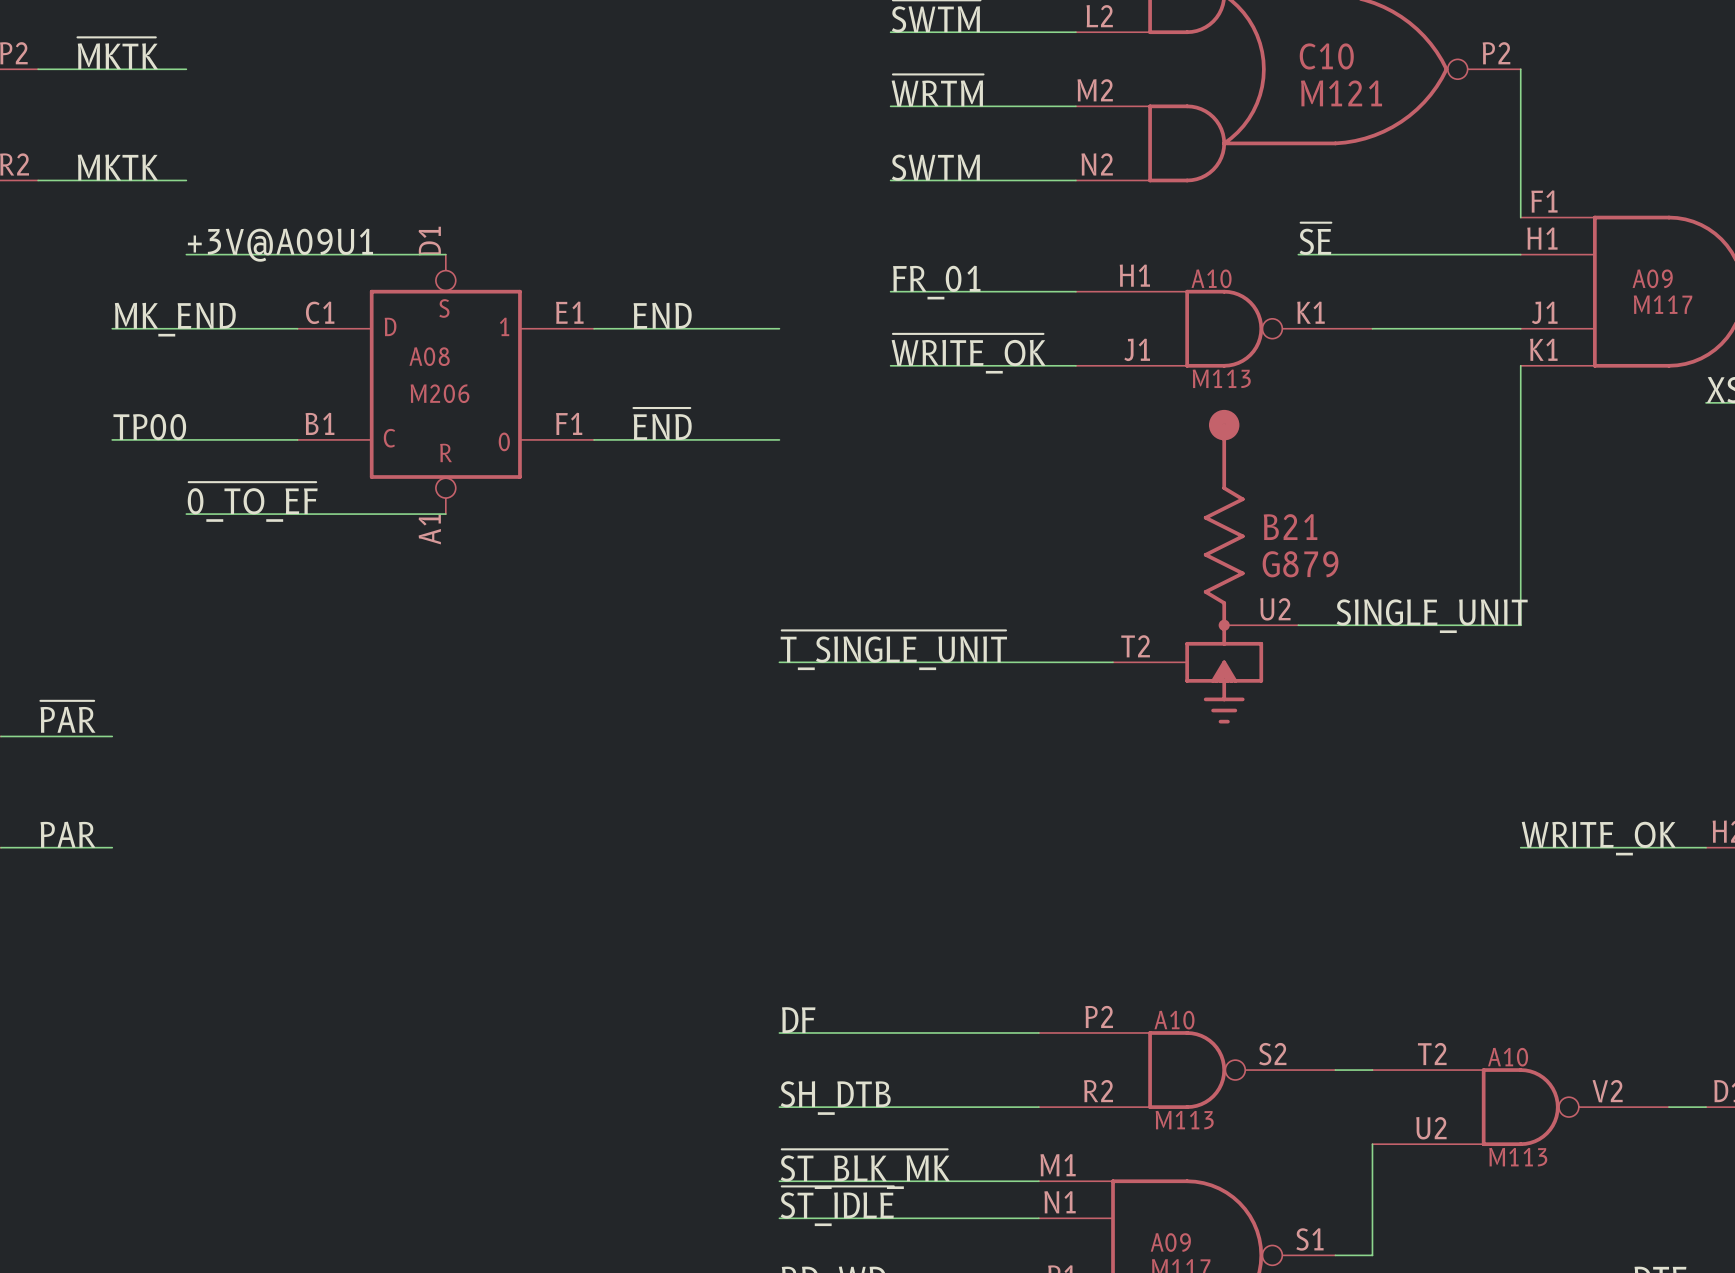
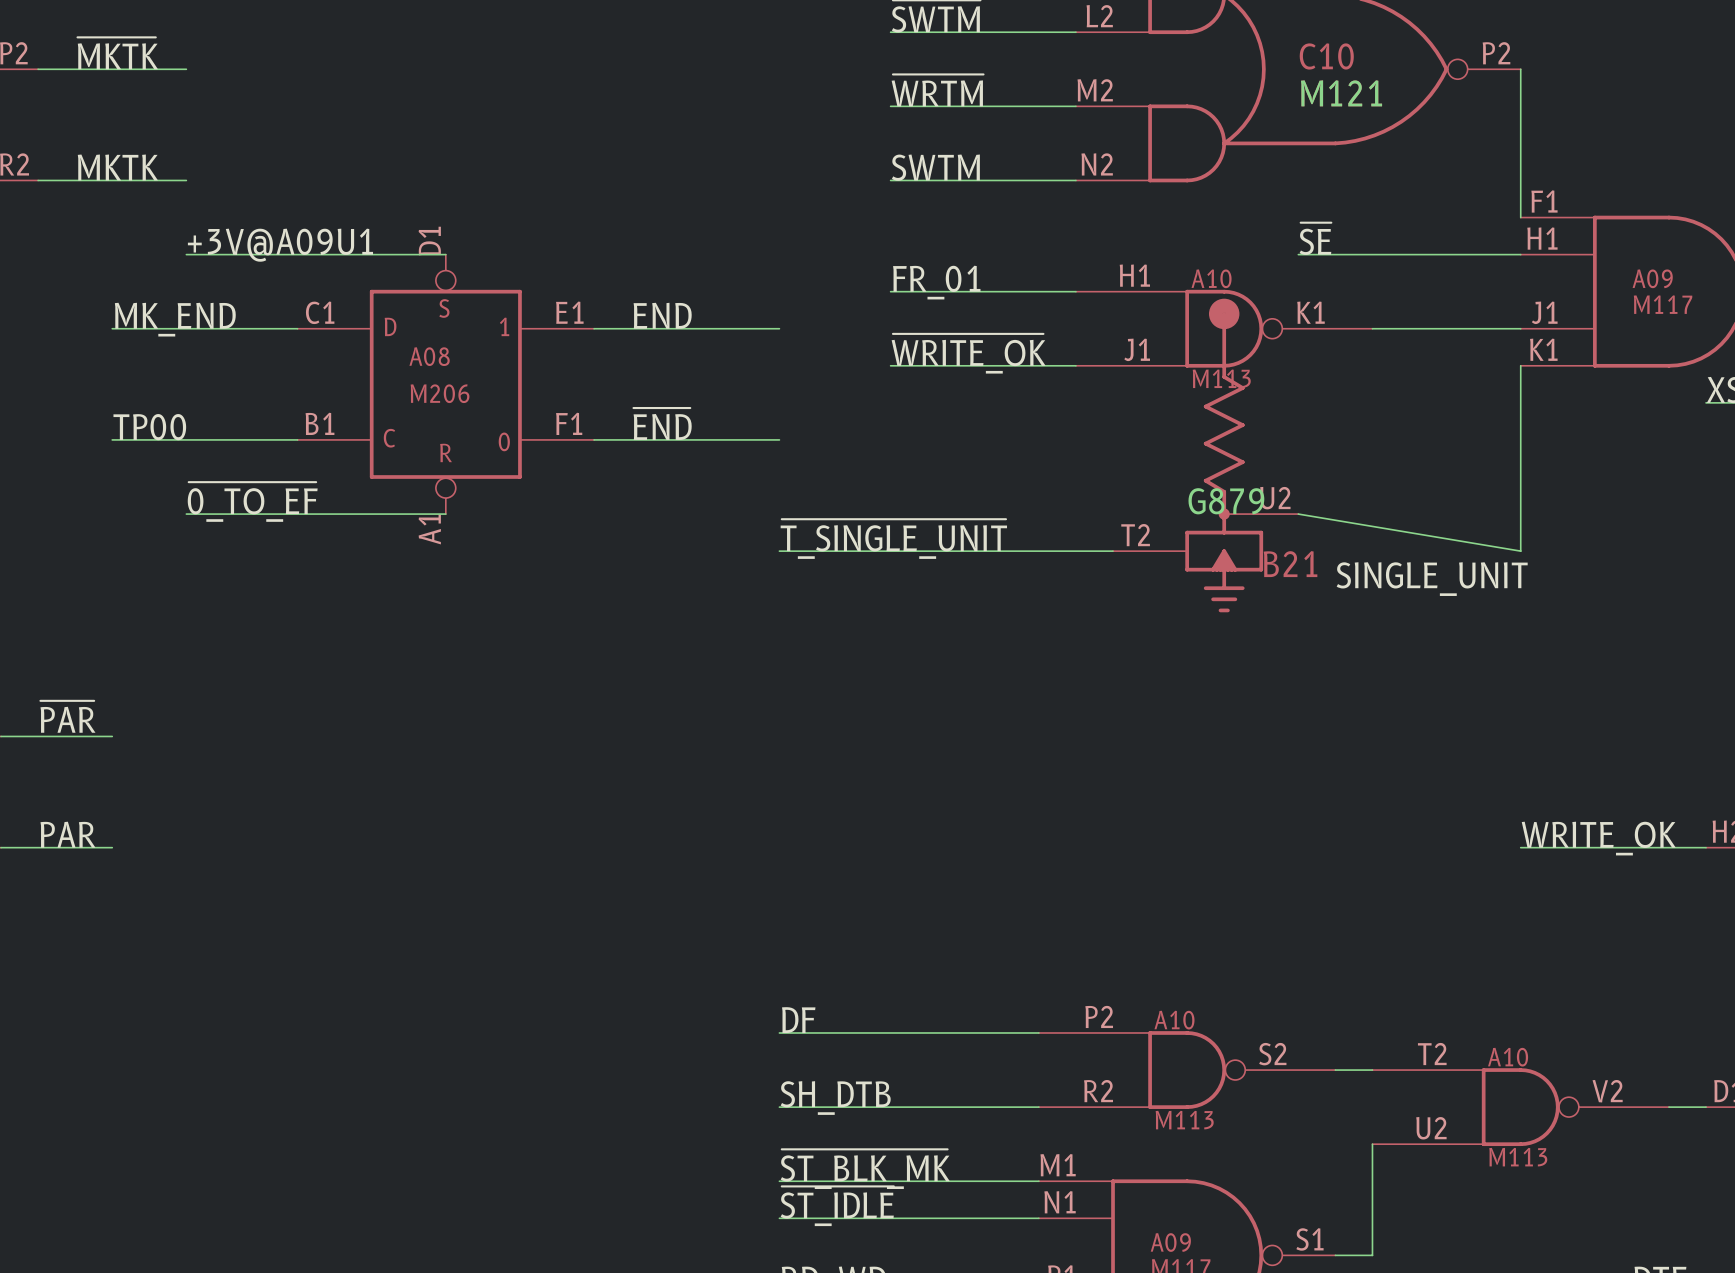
text: none -> M121 (1341, 93)
text: none -> G879 (1226, 501)
B21 name position: B21 (1290, 527) -> B21 (1290, 564)
wire: (1520, 551) (1520, 625) (1298, 625) -> (1520, 551) (1298, 514)
B21 value: G879 (1300, 564) -> none
B21 position: (1205, 566) -> (1205, 455)
label position: SINGLE_UNIT (1432, 616) -> SINGLE_UNIT (1432, 579)
label position: ~{T_SINGLE_UNIT} (893, 650) -> ~{T_SINGLE_UNIT} (893, 539)
wire: (779, 662) (1113, 662) -> (779, 551) (1113, 551)

